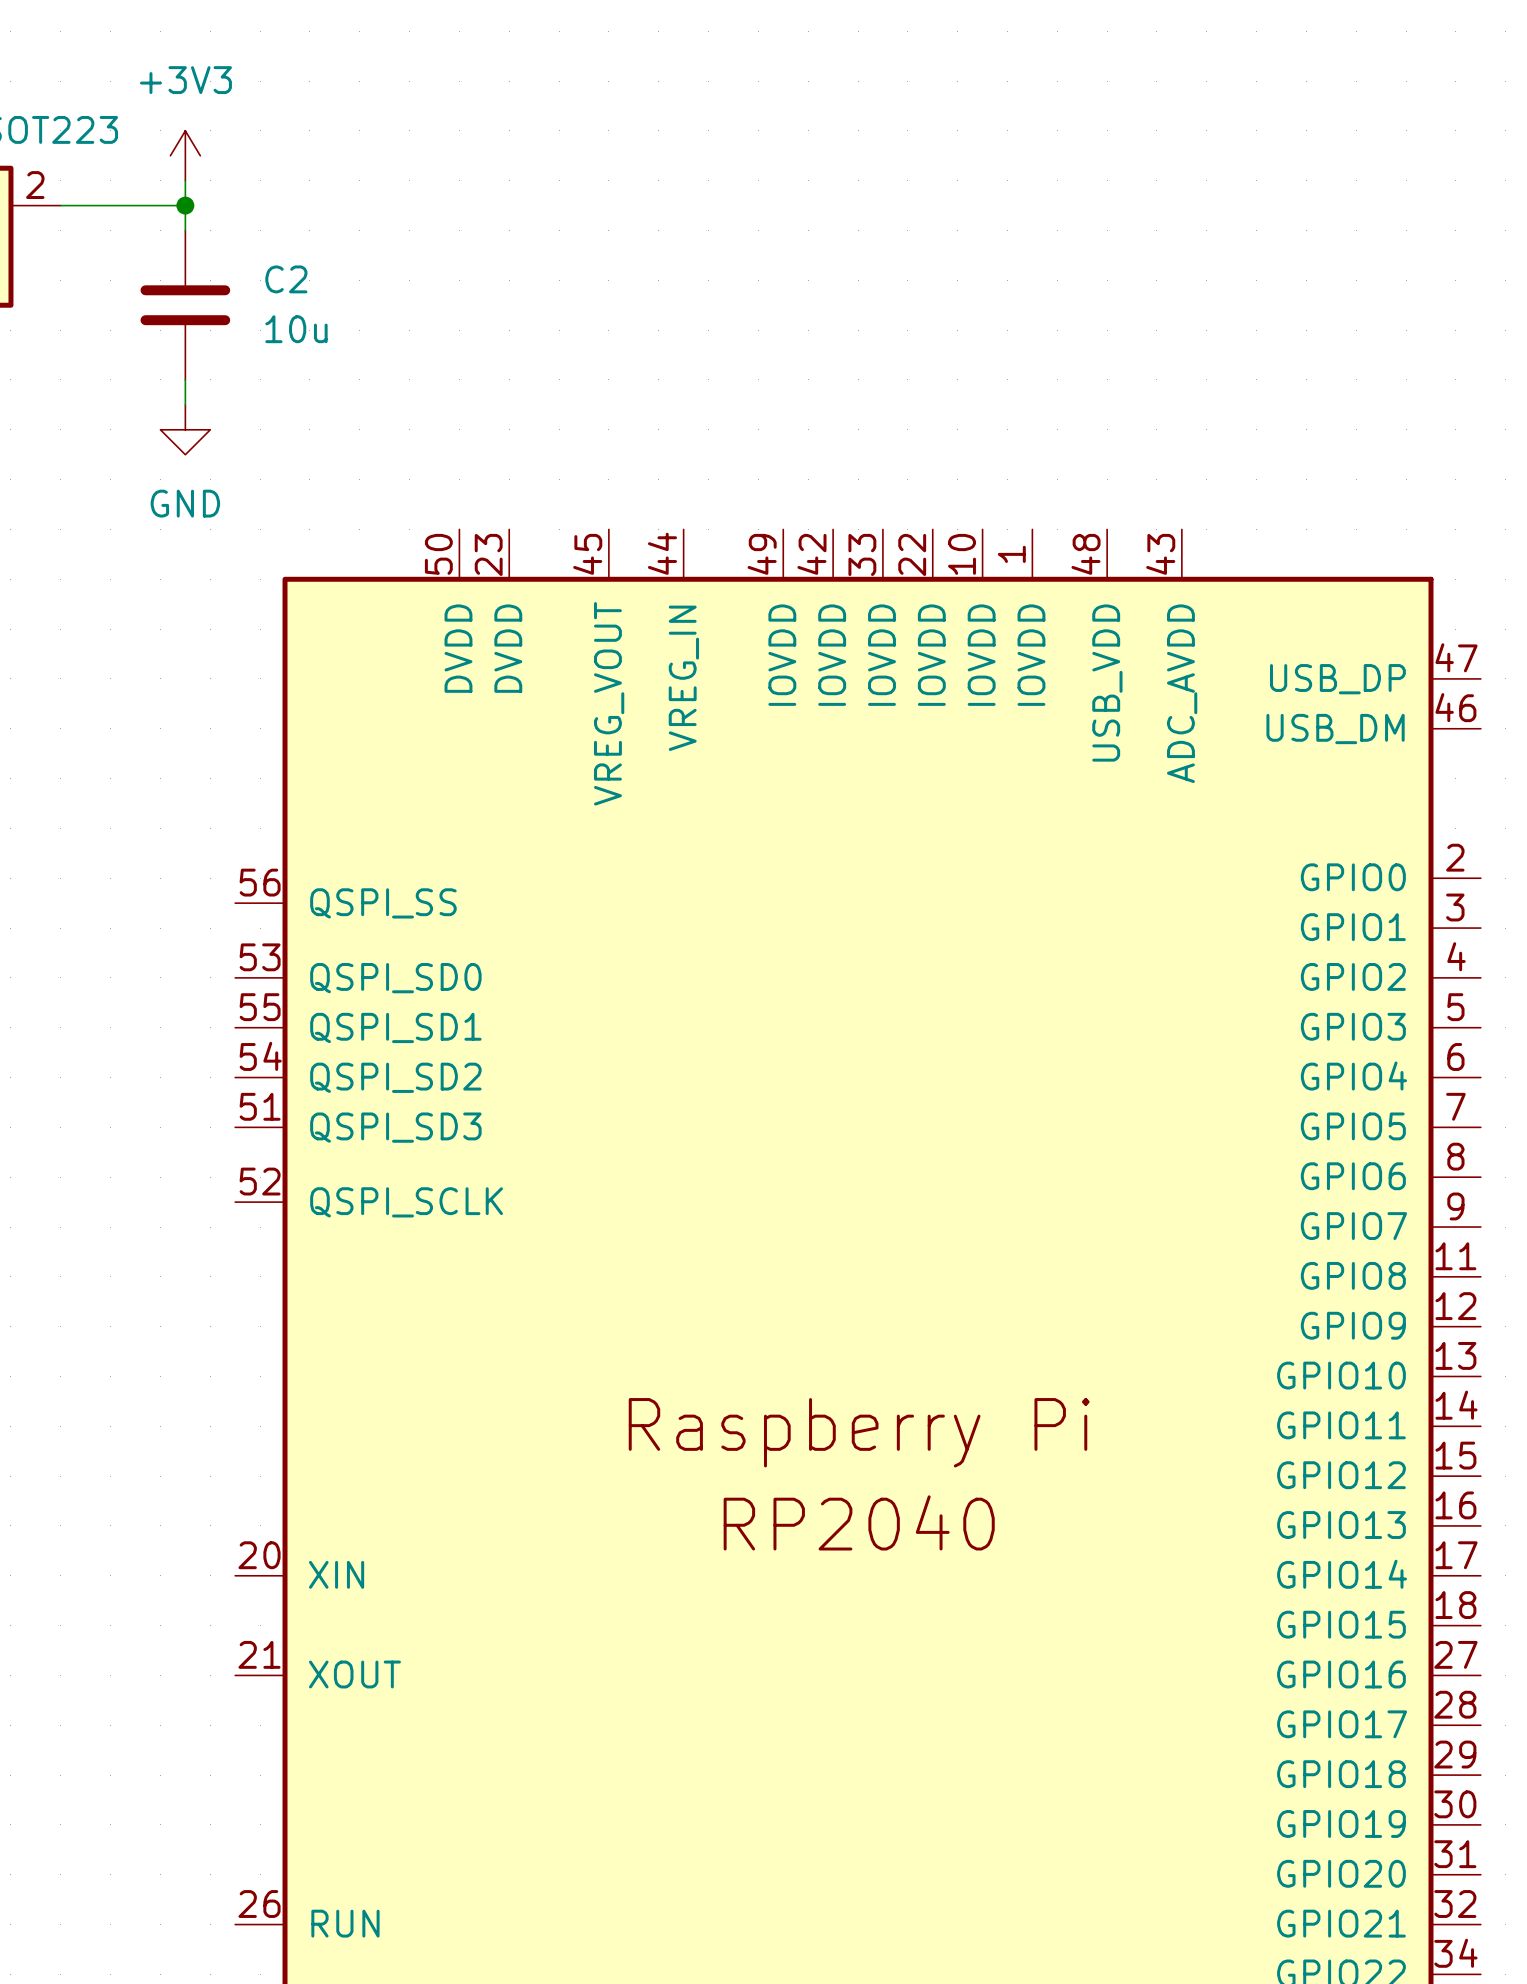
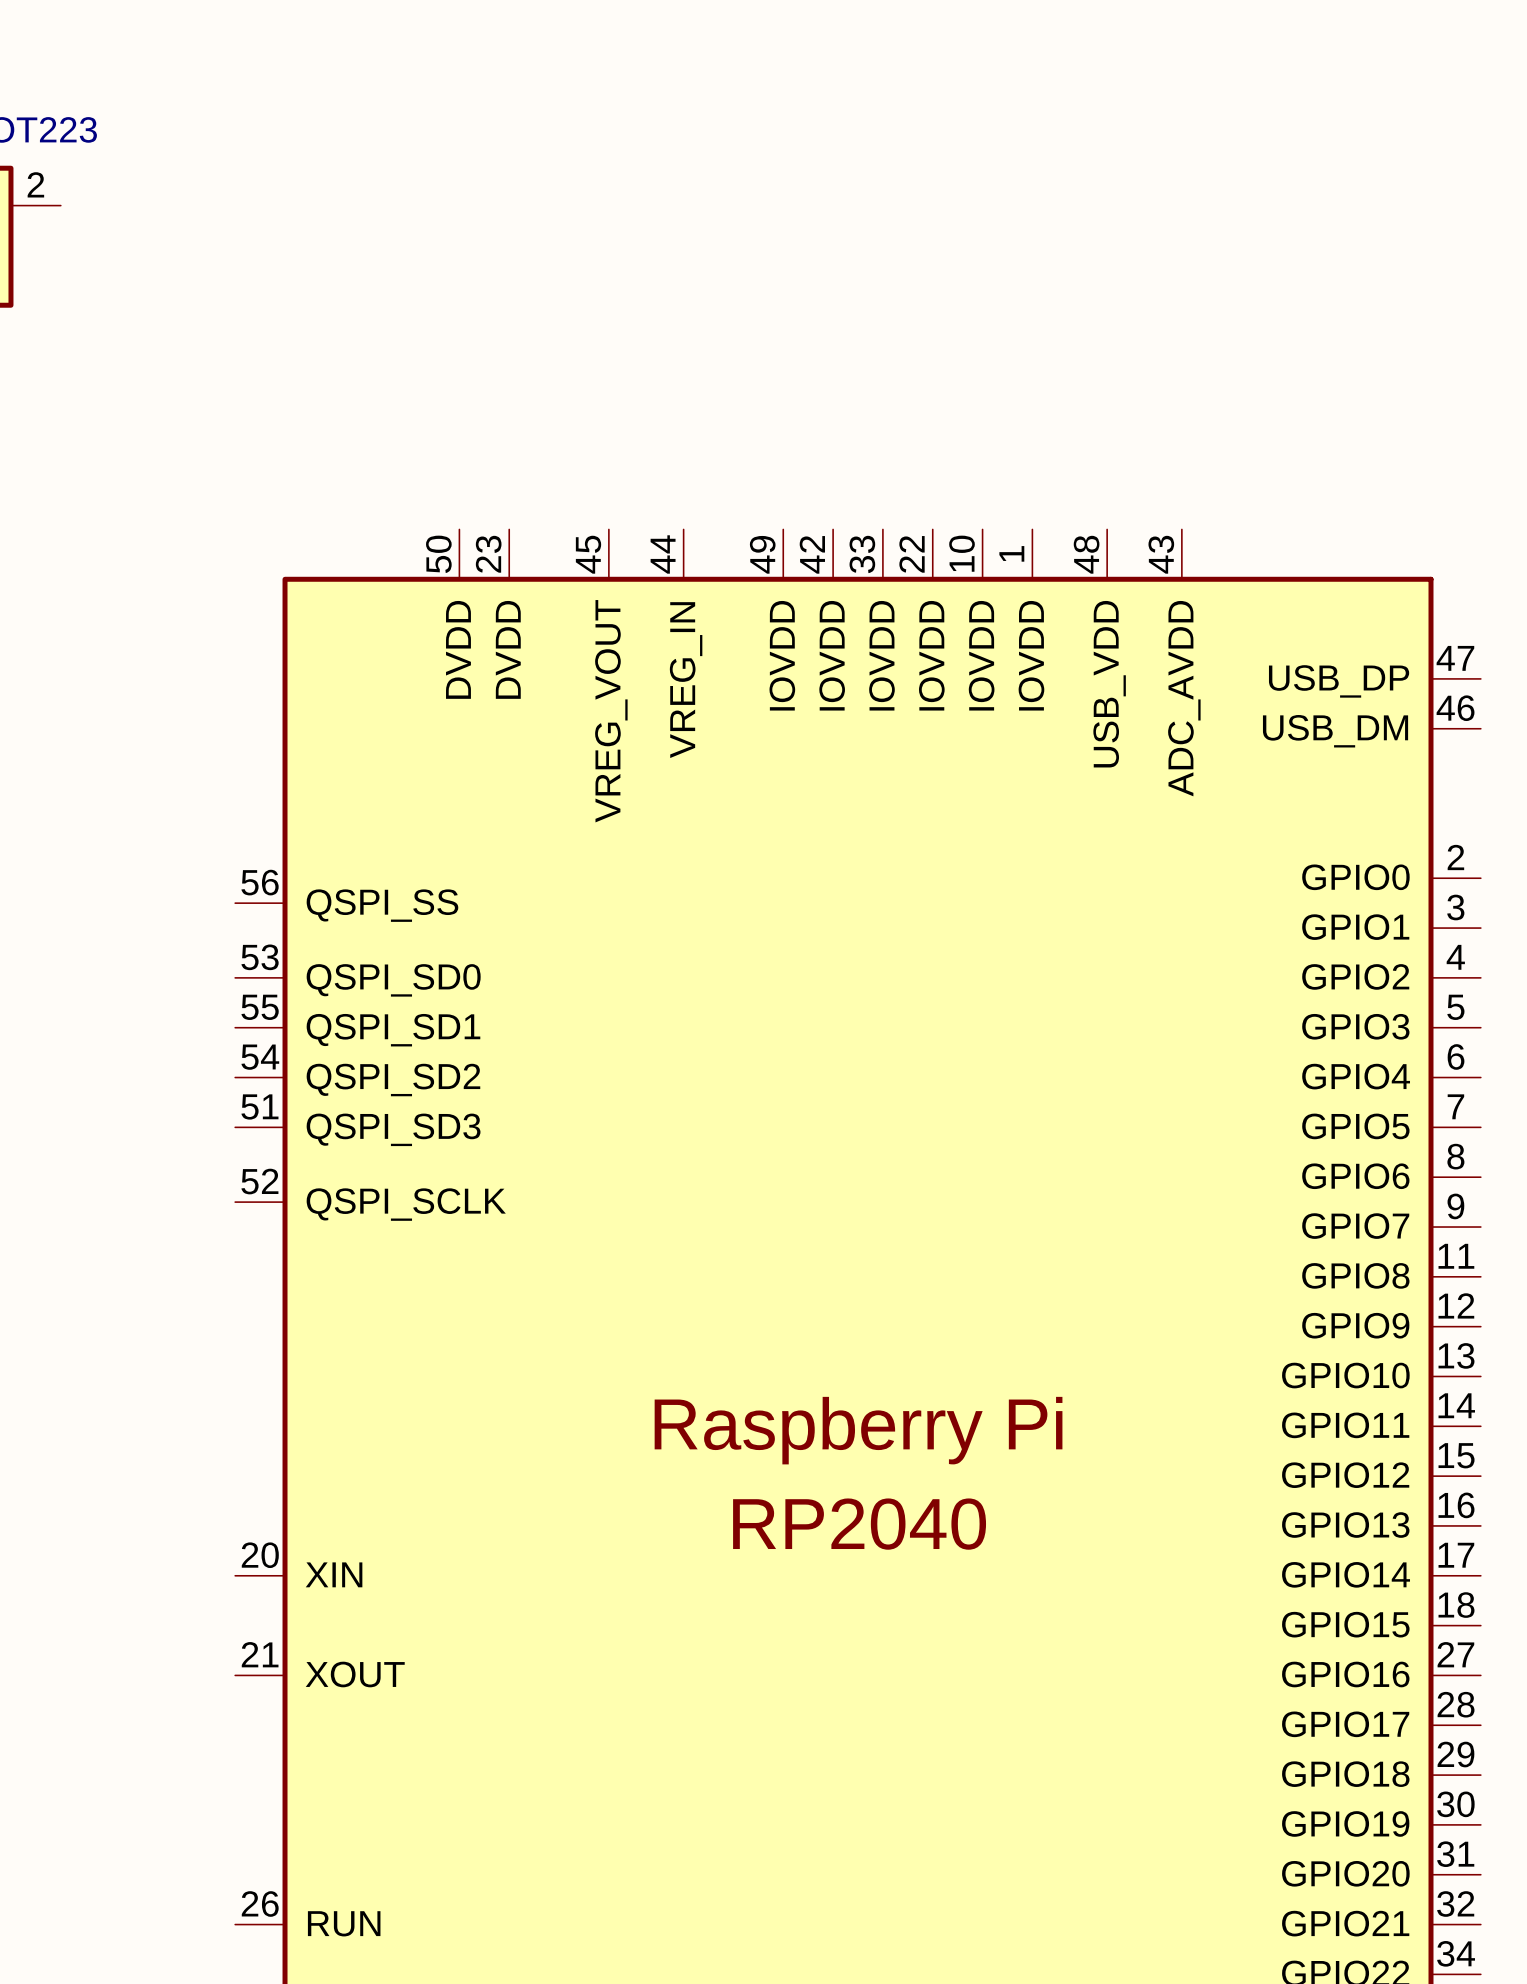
power symbol: +3V3 (185, 155) -> none
wire: (185, 180) (185, 230) -> none
wire: (60, 205) (185, 205) -> none
junction: (185, 205) -> none
C2: 10u (185, 305) -> none
wire: (185, 379) (185, 404) -> none
power symbol: GND (185, 429) -> none

